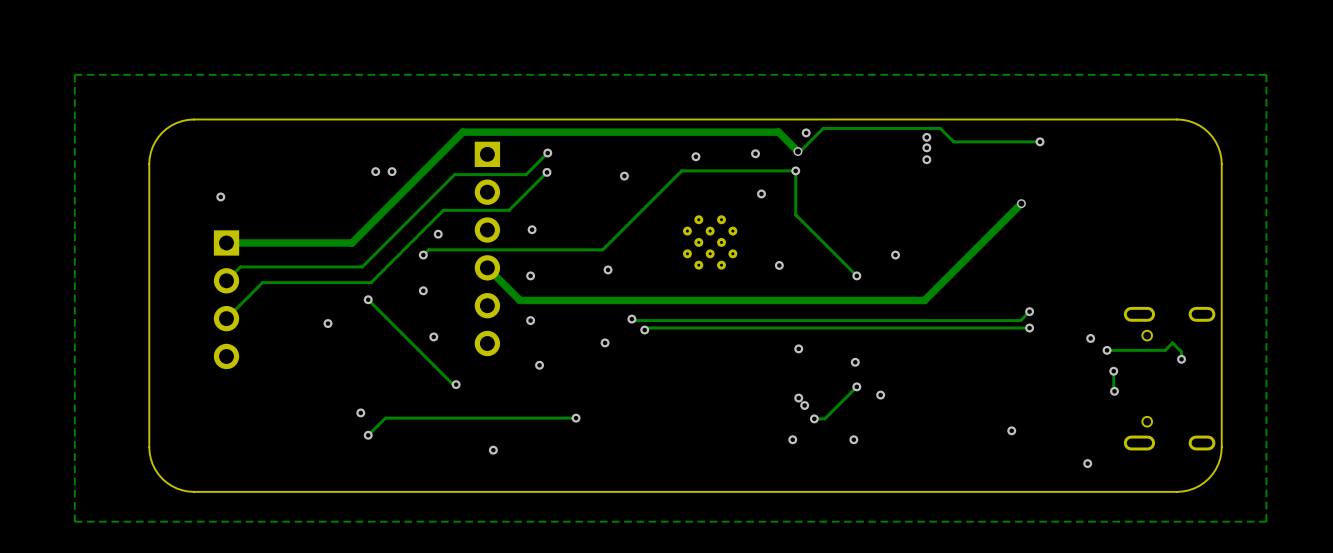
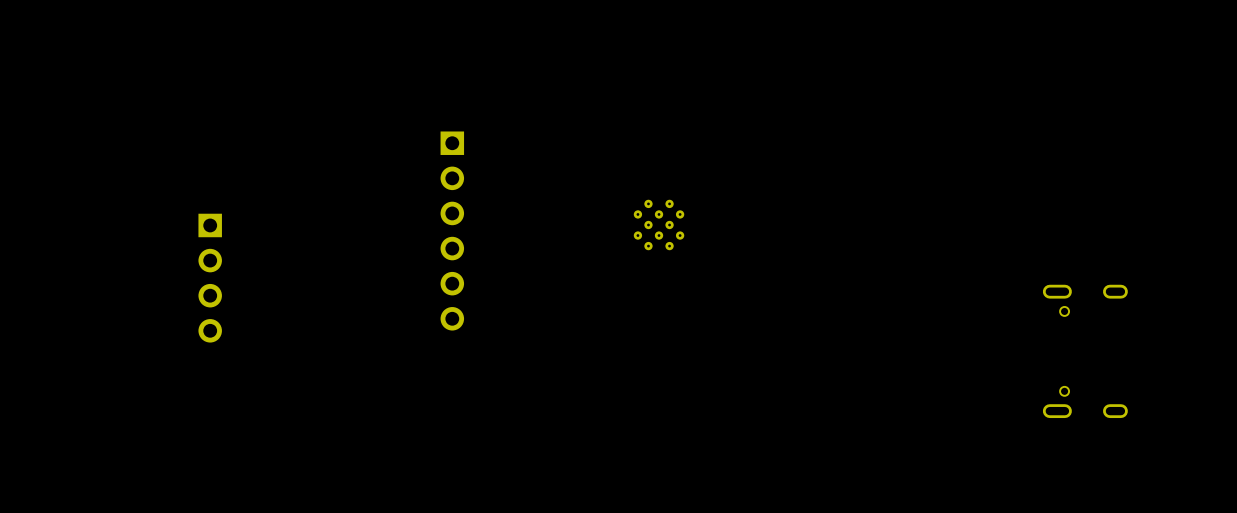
zone outline: (1266, 74) (1266, 521) (74, 521) (74, 74) (1266, 74) -> none
board edge: (1177, 119) (193, 119) (182, 121) (166, 128) (158, 136) (152, 147) (149, 158) (150, 458) (158, 474) (166, 482) (182, 490) (193, 491) (1177, 491) (1188, 490) (1204, 482) (1212, 474) (1218, 464) (1221, 453) (1221, 164) (1218, 147) (1208, 132) (1194, 122) (1177, 119) -> none
via: (806, 132) -> none
via: (926, 137) -> none
track: (1040, 141) (953, 141) (940, 128) (823, 128) (797, 151) (778, 132) (462, 132) (352, 242) (226, 242) -> none
via: (1040, 141) -> none
via: (926, 147) -> none
via: (797, 151) -> none
track: (547, 153) (526, 174) (454, 174) (362, 266) (240, 266) (226, 280) -> none
via: (547, 153) -> none
via: (755, 153) -> none
via: (695, 156) -> none
via: (926, 159) -> none
via: (795, 170) -> none
via: (375, 171) -> none
via: (392, 171) -> none
track: (546, 172) (509, 210) (443, 210) (371, 282) (262, 282) (226, 318) -> none
via: (546, 172) -> none
via: (624, 176) -> none
via: (761, 193) -> none
via: (220, 196) -> none
track: (1021, 203) (924, 300) (520, 300) (487, 267) -> none
via: (1021, 203) -> none
via: (532, 229) -> none
via: (438, 234) -> none
track: (423, 255) (428, 249) (602, 249) (681, 170) (795, 170) (795, 214) (856, 275) -> none
via: (423, 255) -> none
via: (895, 255) -> none
via: (779, 265) -> none
via: (608, 269) -> none
via: (530, 275) -> none
via: (856, 275) -> none
via: (423, 290) -> none
track: (368, 299) (453, 384) (456, 384) -> none
via: (368, 299) -> none
track: (1029, 311) (1020, 320) (631, 319) -> none
via: (1029, 311) -> none
via: (631, 319) -> none
via: (530, 320) -> none
via: (328, 323) -> none
track: (1029, 328) (645, 328) (644, 330) -> none
via: (1029, 328) -> none
via: (644, 330) -> none
via: (433, 336) -> none
via: (1090, 338) -> none
via: (605, 342) -> none
via: (798, 348) -> none
track: (1107, 350) (1165, 350) (1172, 342) (1181, 351) (1181, 359) -> none
via: (1107, 350) -> none
via: (1181, 359) -> none
via: (855, 362) -> none
via: (539, 365) -> none
track: (1113, 371) (1114, 391) -> none
via: (1113, 371) -> none
via: (456, 384) -> none
track: (856, 386) (824, 418) (814, 418) -> none
via: (856, 386) -> none
via: (1114, 391) -> none
via: (880, 395) -> none
via: (798, 398) -> none
via: (804, 405) -> none
via: (360, 412) -> none
track: (576, 418) (385, 418) (368, 435) -> none
via: (576, 418) -> none
via: (814, 418) -> none
via: (1011, 430) -> none
via: (368, 435) -> none
via: (792, 439) -> none
via: (853, 439) -> none
via: (493, 450) -> none
via: (1087, 463) -> none

